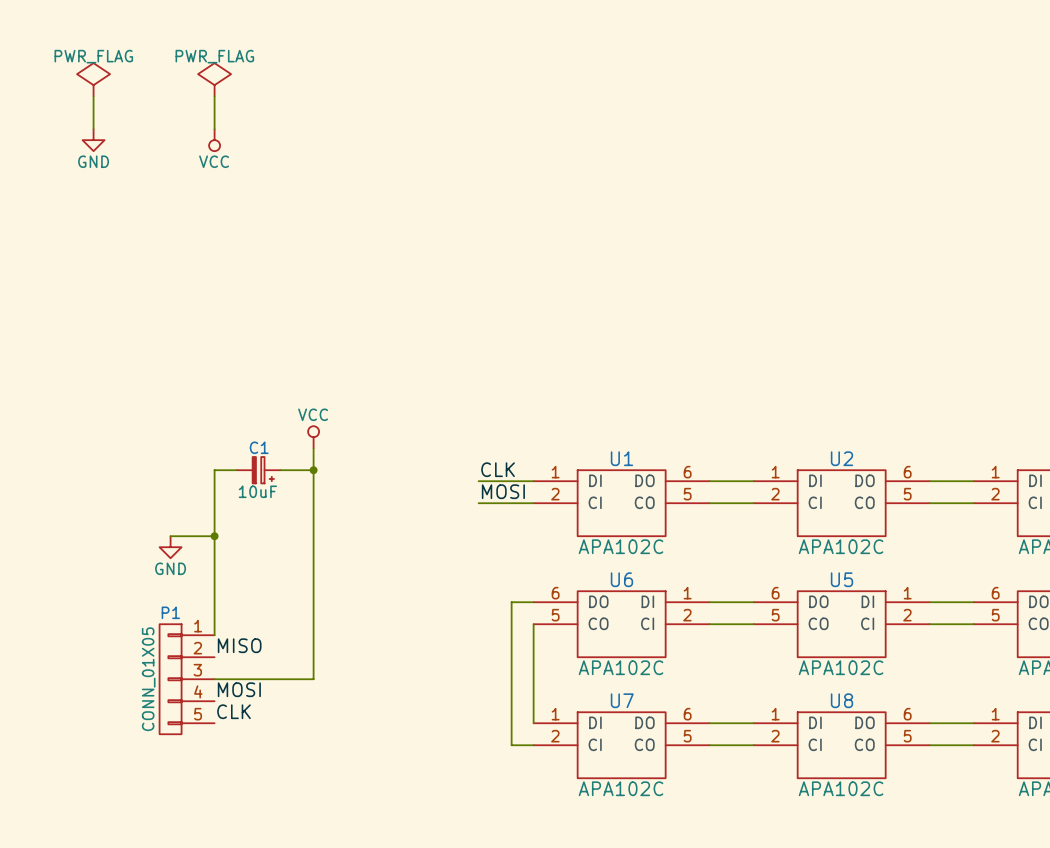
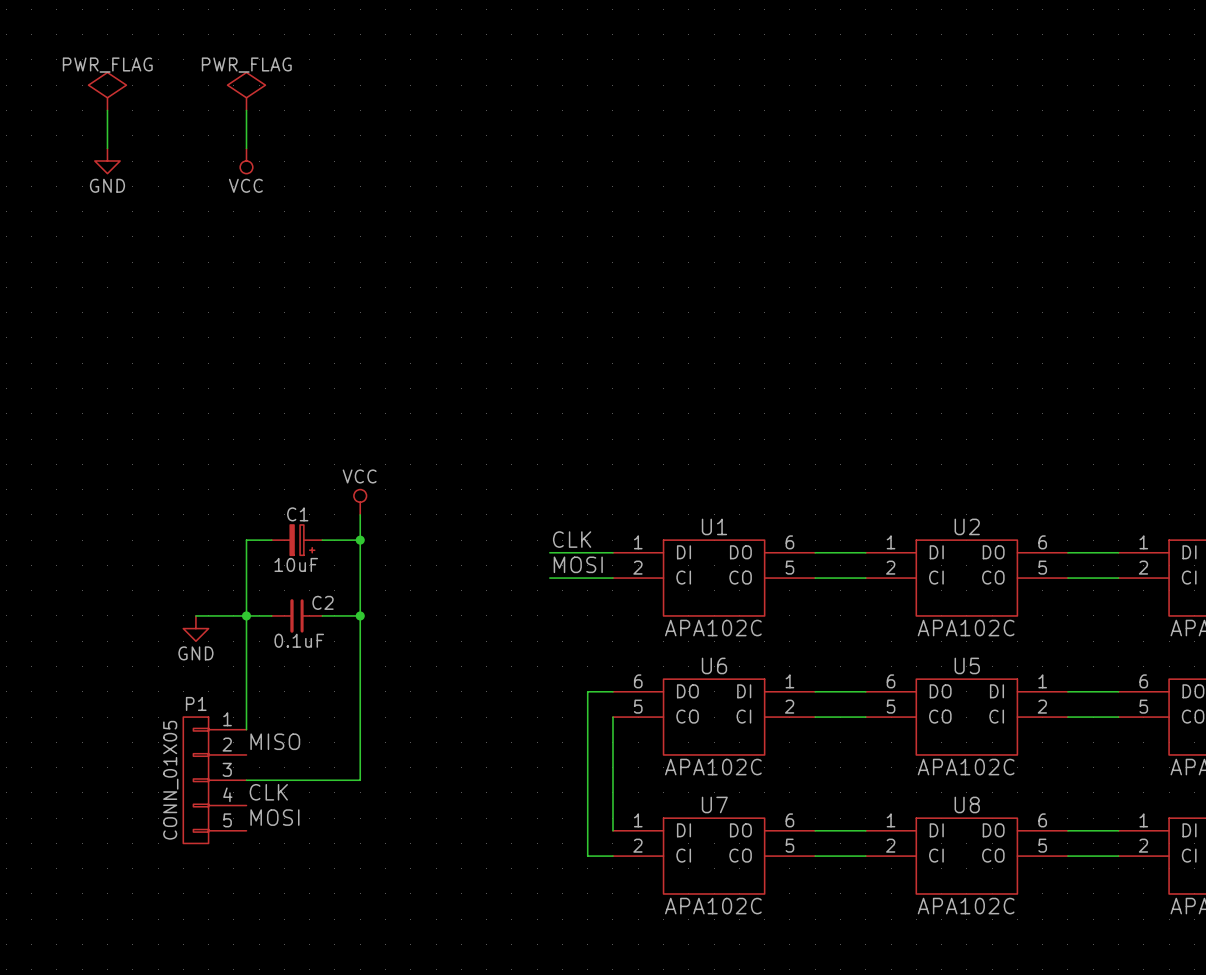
wire: none -> (246, 615) (271, 615)
C2: none -> 0.1uF (297, 615)
wire: none -> (322, 615) (360, 615)
junction: none -> (360, 615)
label: MOSI (239, 689) -> CLK (268, 792)
label: CLK (233, 711) -> MOSI (274, 817)

